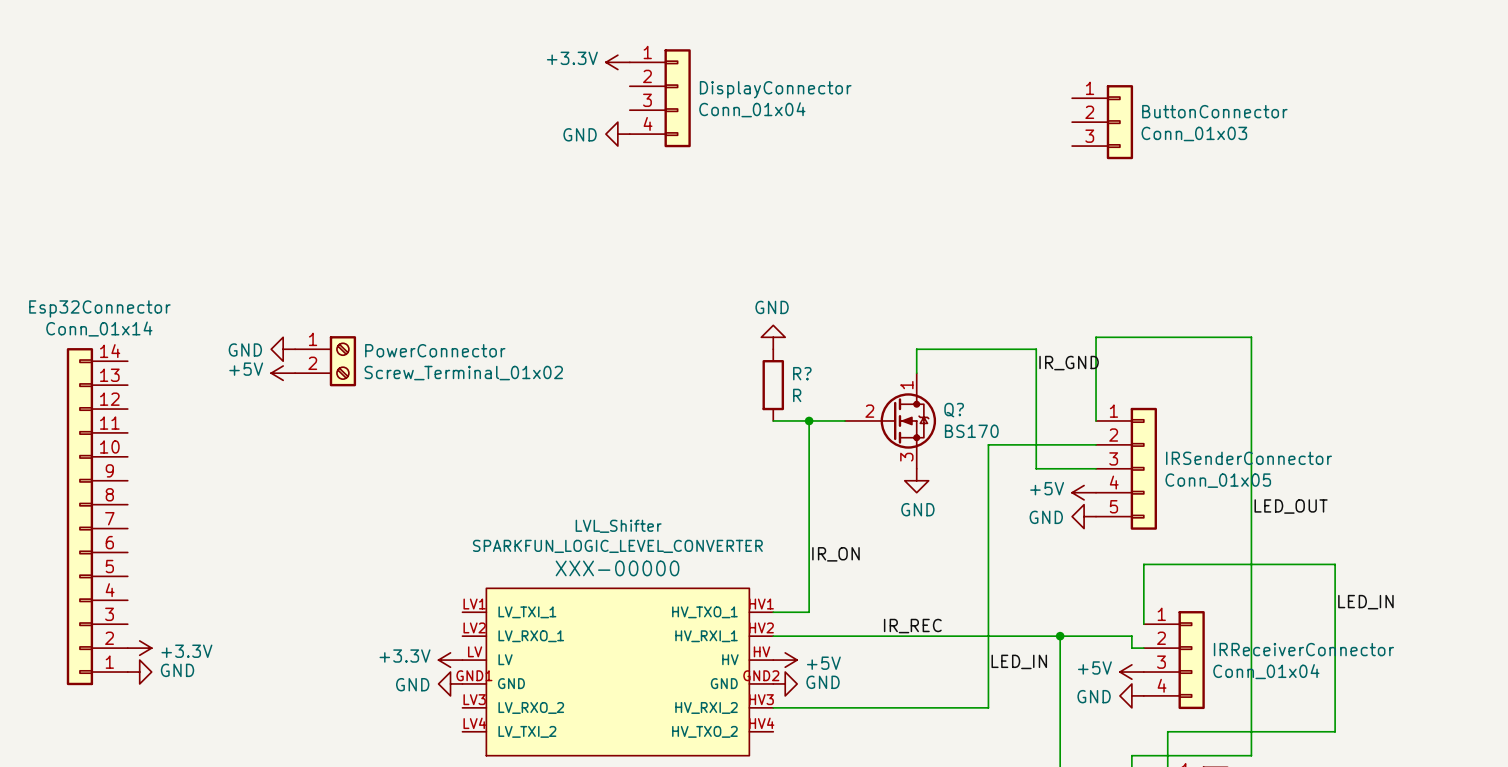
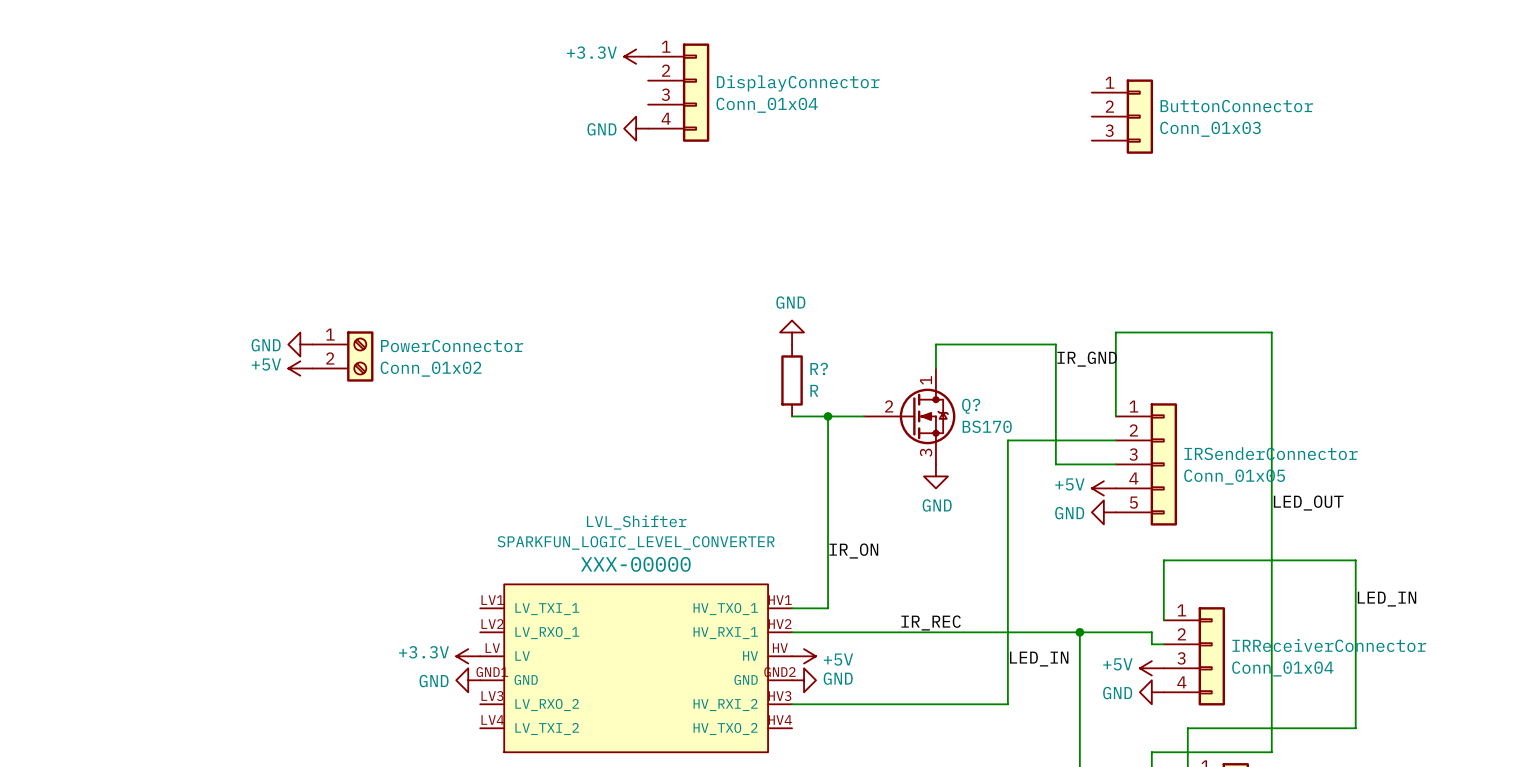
PowerConnector value: Screw_Terminal_01x02 (463, 373) -> Conn_01x02 (431, 369)
Esp32Connector: Conn_01x14 (97, 516) -> none
power symbol: +3.3V (139, 648) -> none
power symbol: GND (139, 672) -> none

